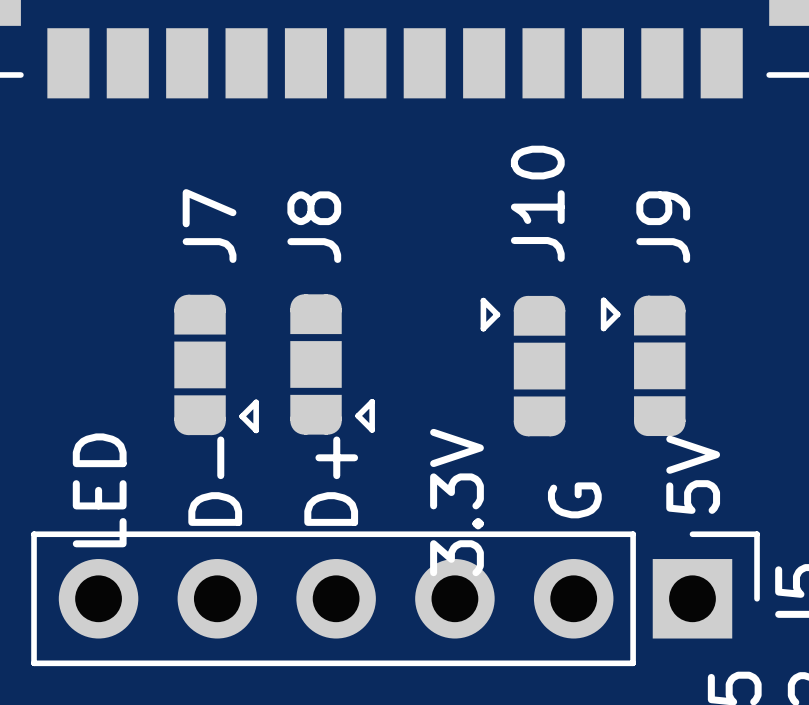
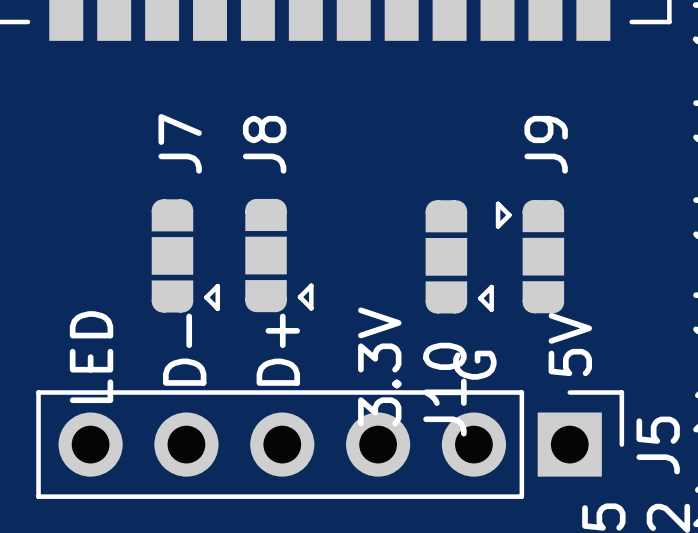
J10 rotation: 0° (522, 366) -> 180° (459, 256)

